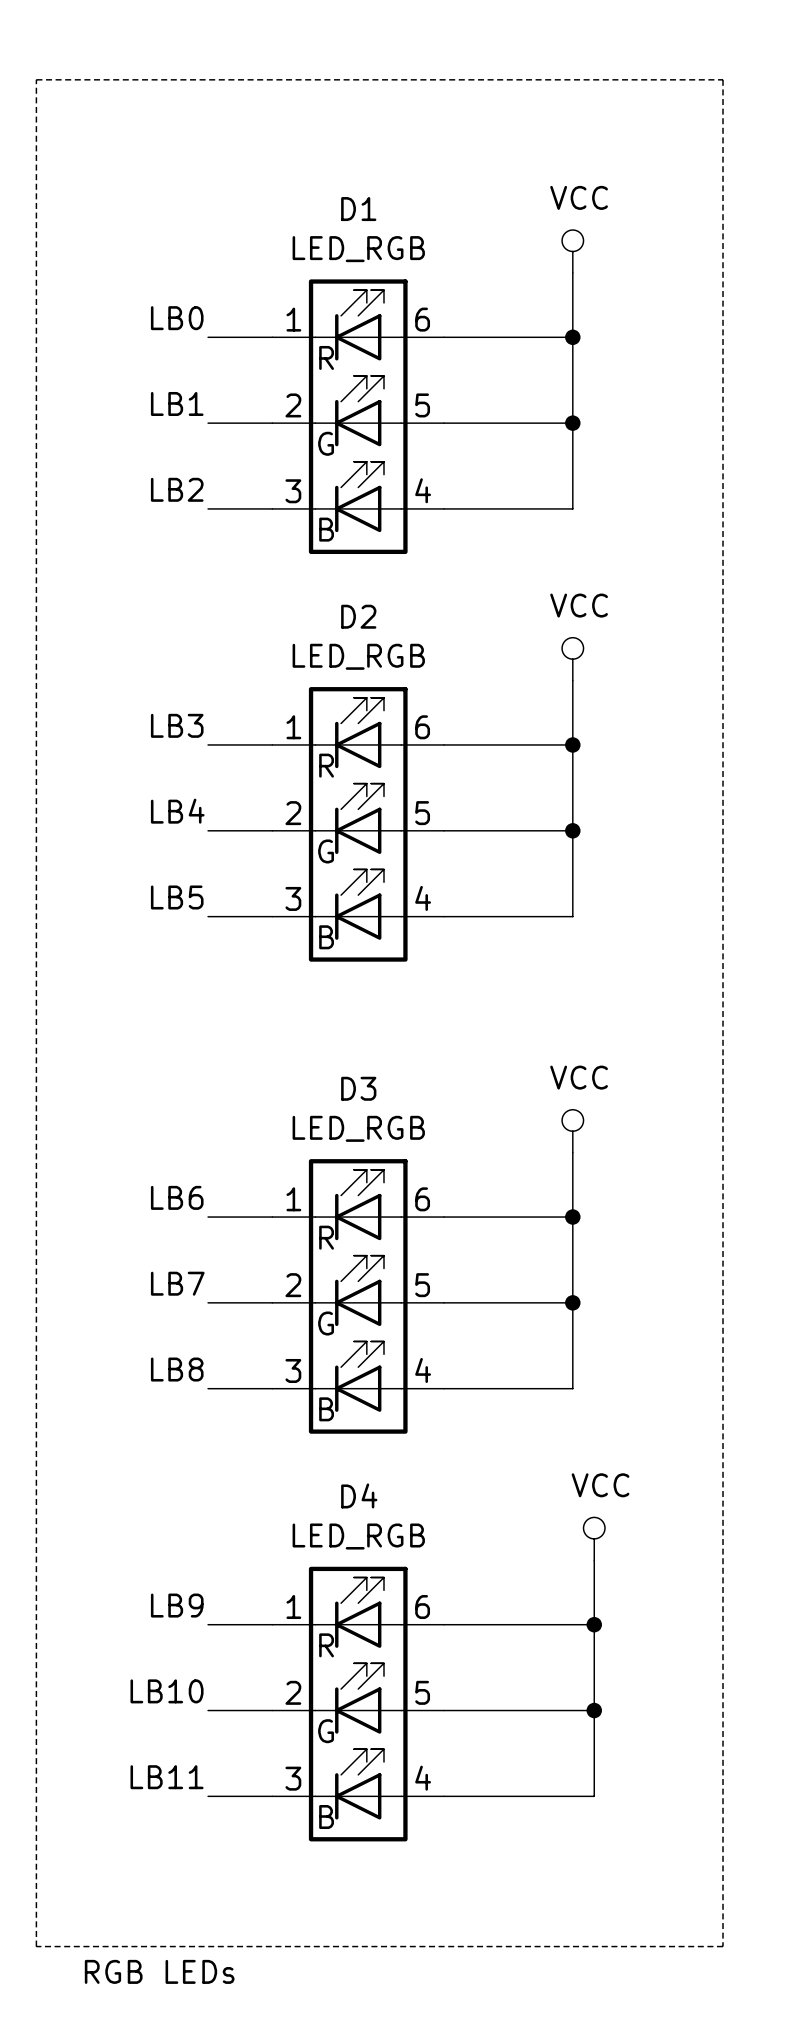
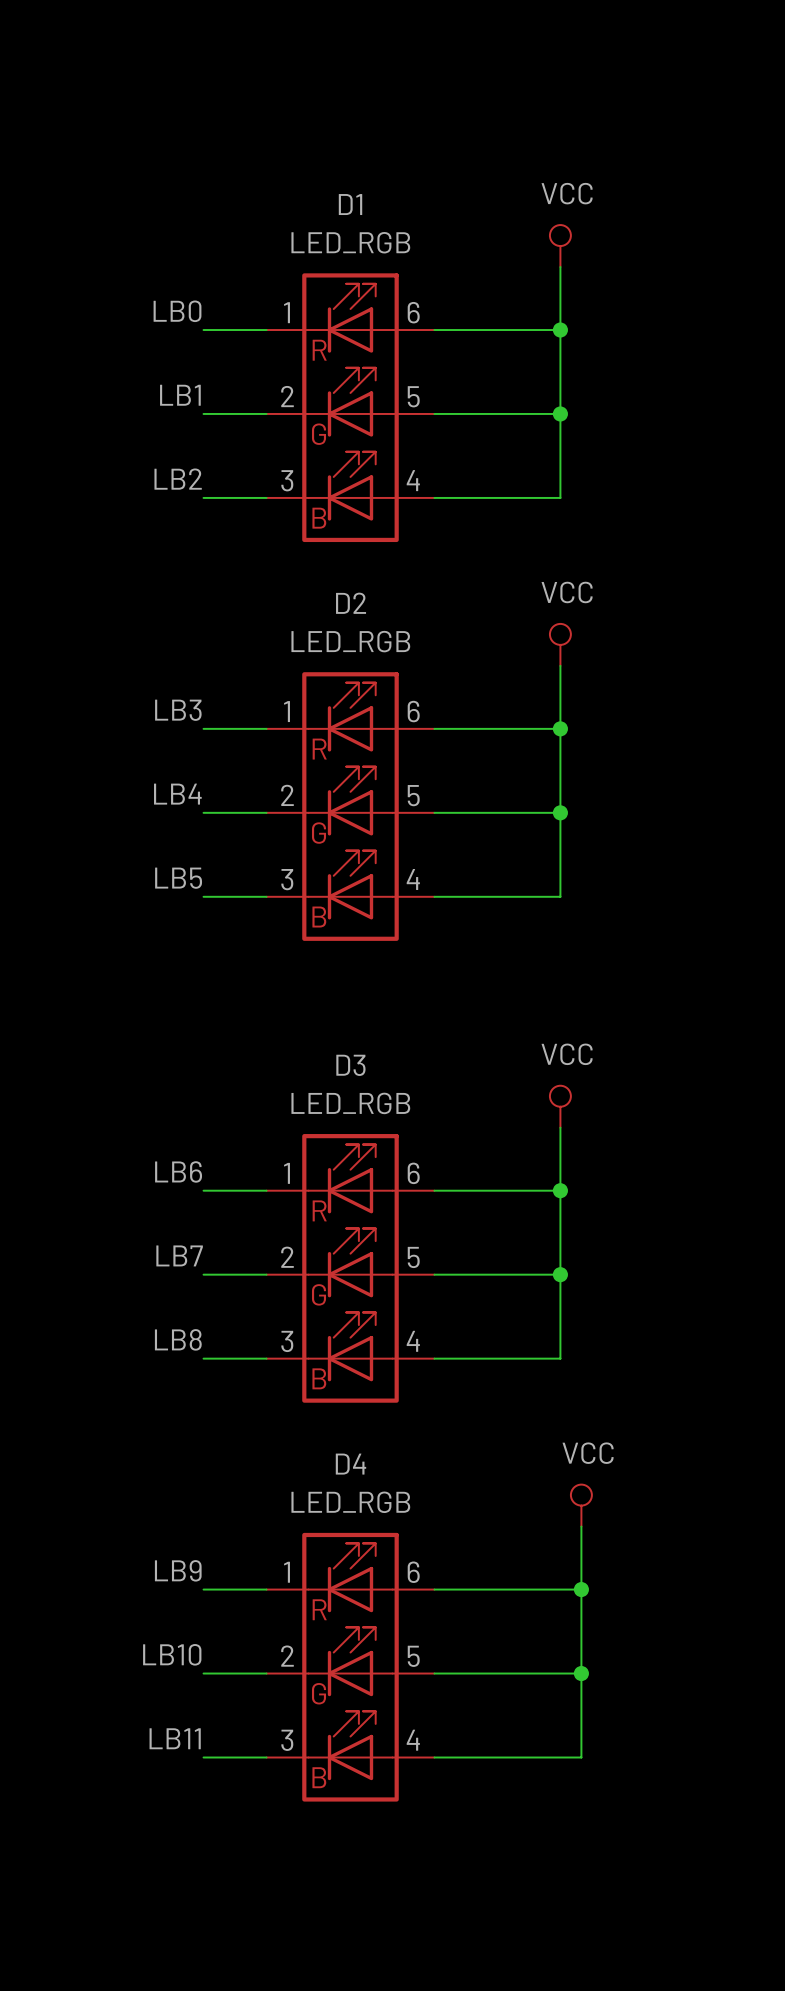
line: (36, 79) (723, 79) (723, 1946) (36, 1946) (36, 79) -> none
text: RGB LEDs (159, 1971) -> none

